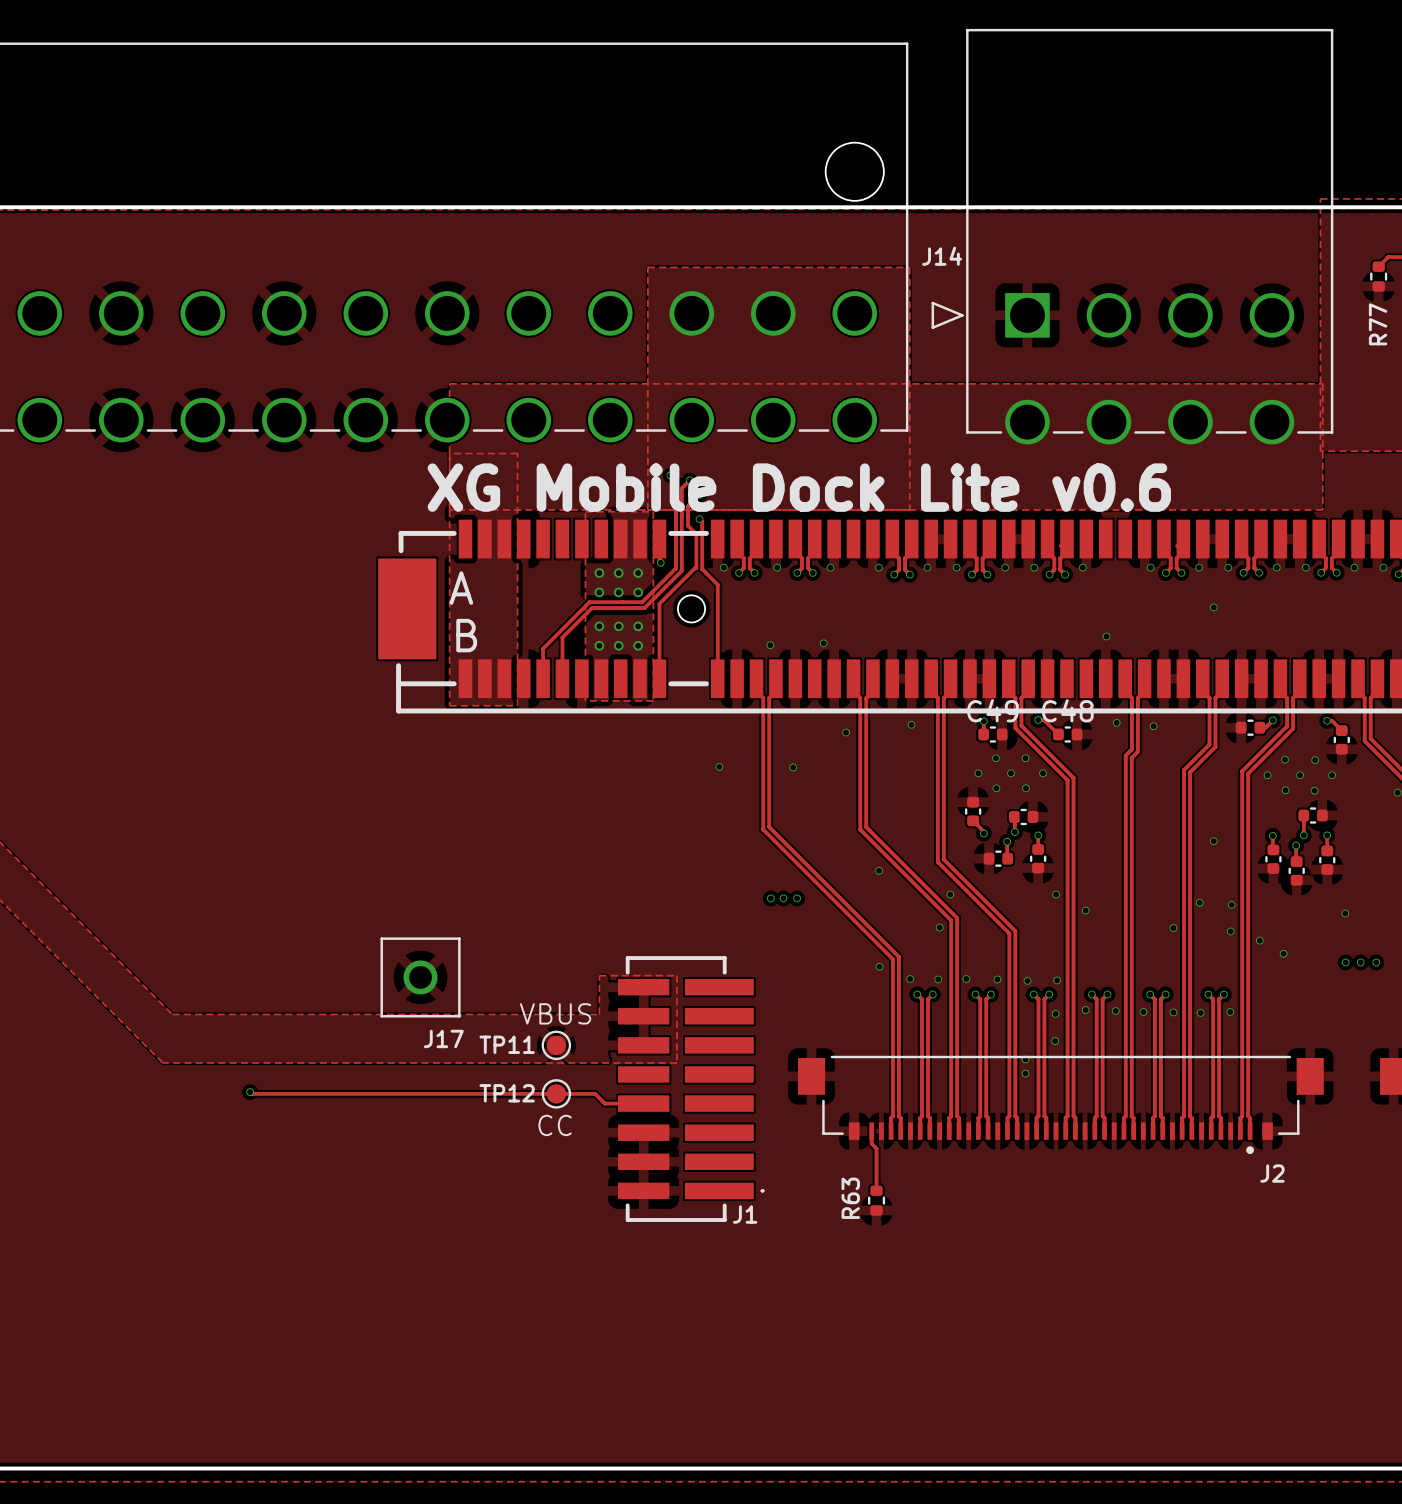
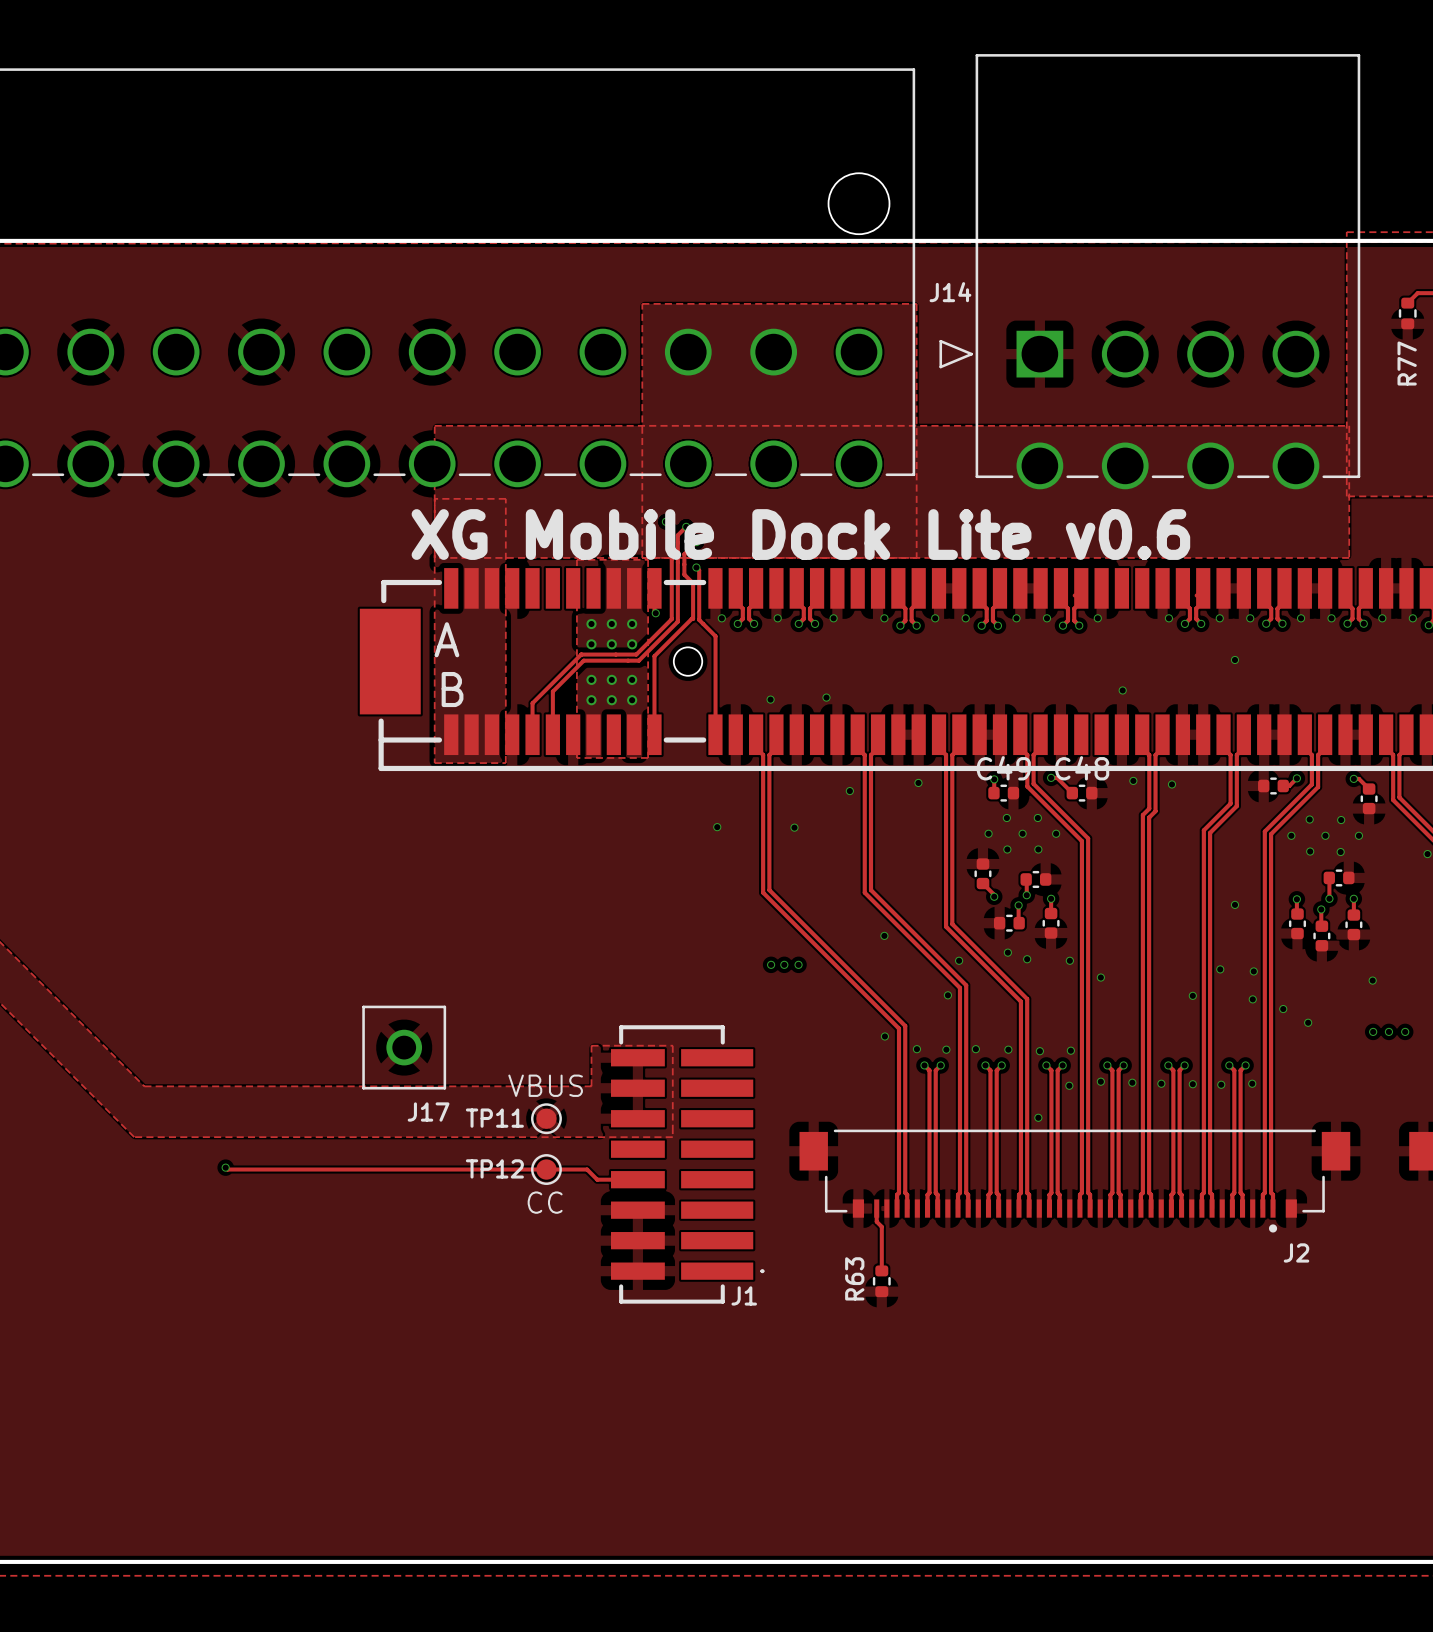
via: none -> (1007, 952)
via: none -> (1027, 959)
via: (1055, 1041) -> none
via: none -> (1038, 1117)
via: (1025, 1059) -> none
via: (1025, 1073) -> none

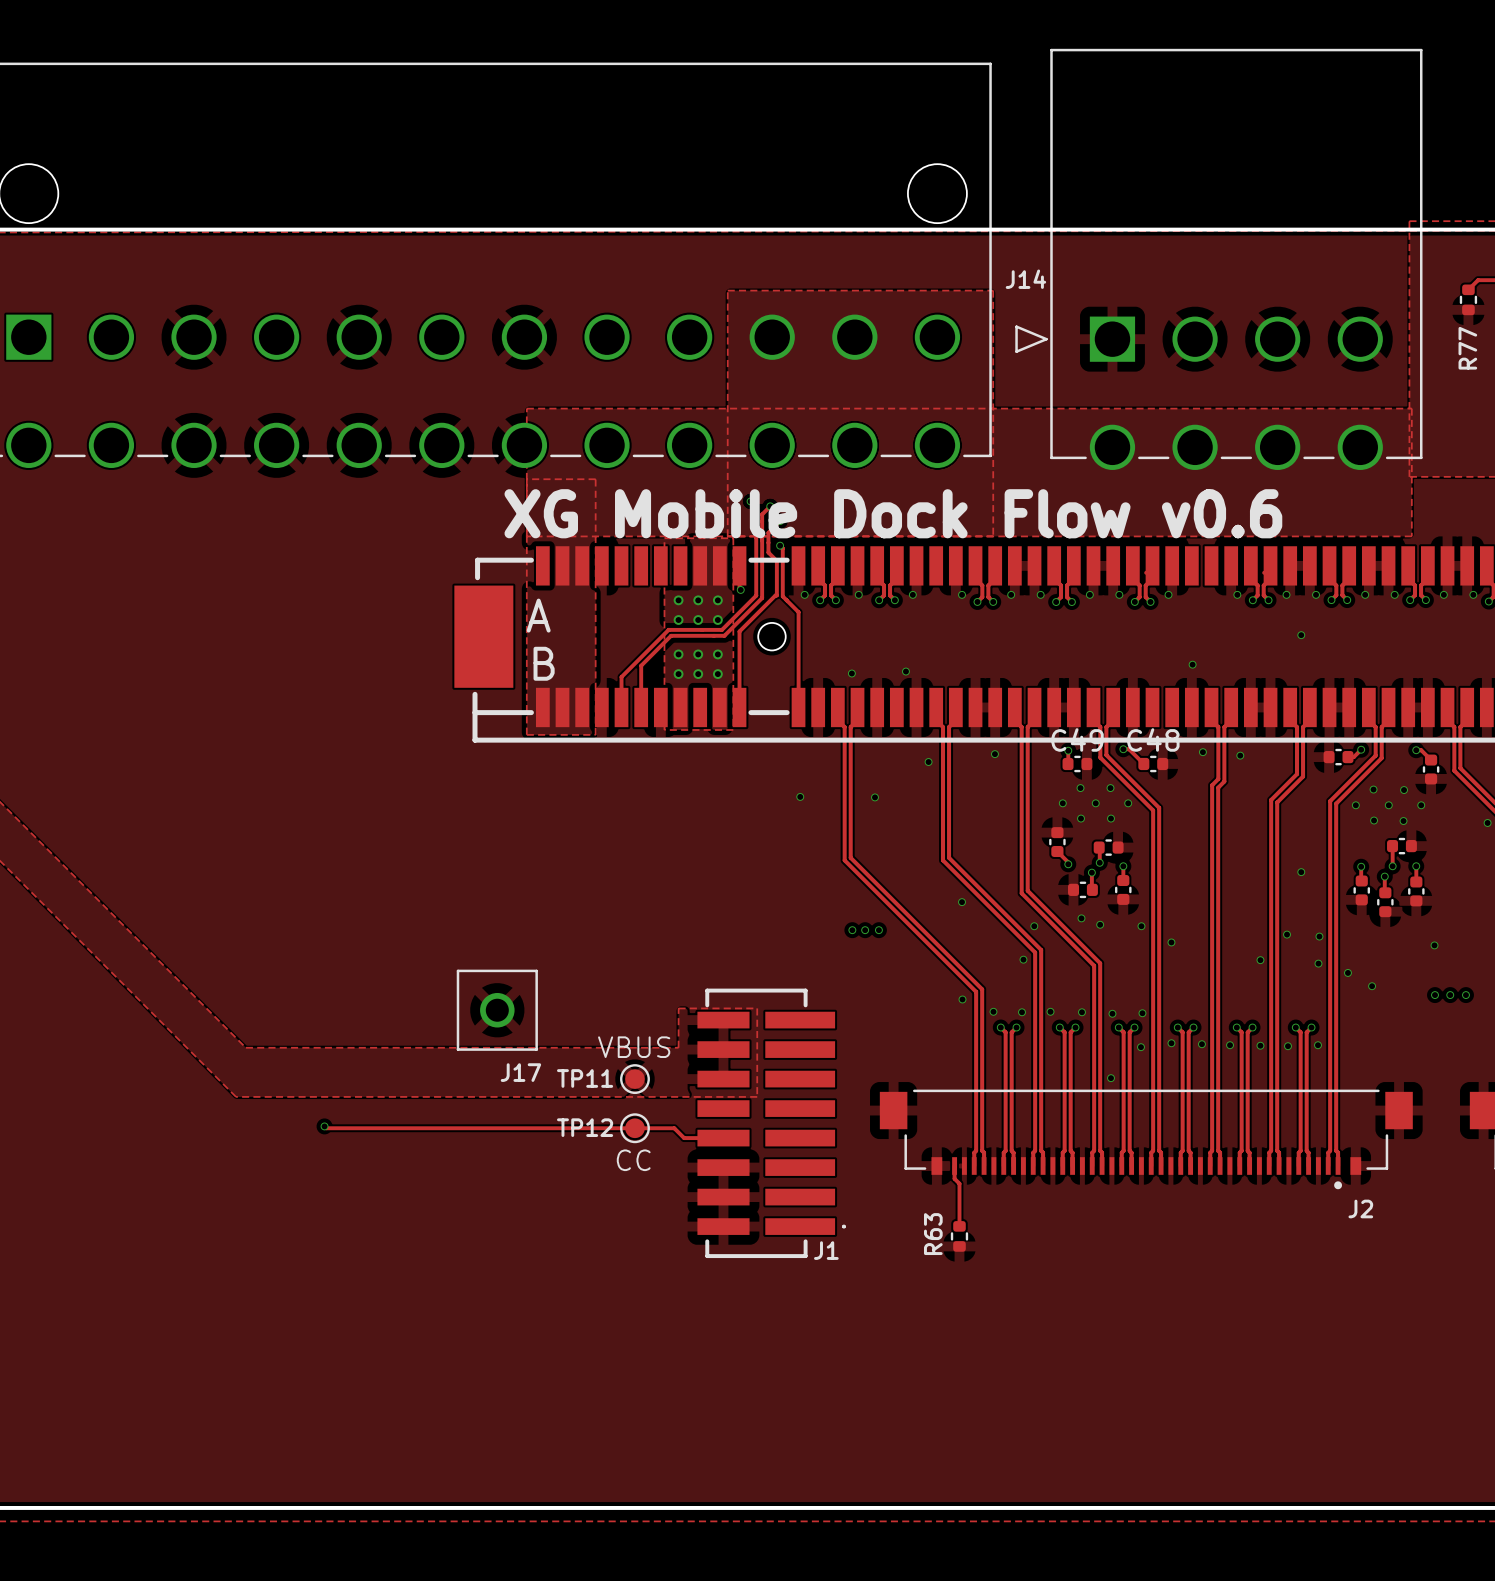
text: XG Mobile Dock Lite v0.6 (800, 534) -> XG Mobile Dock Flow v0.6 (893, 513)

